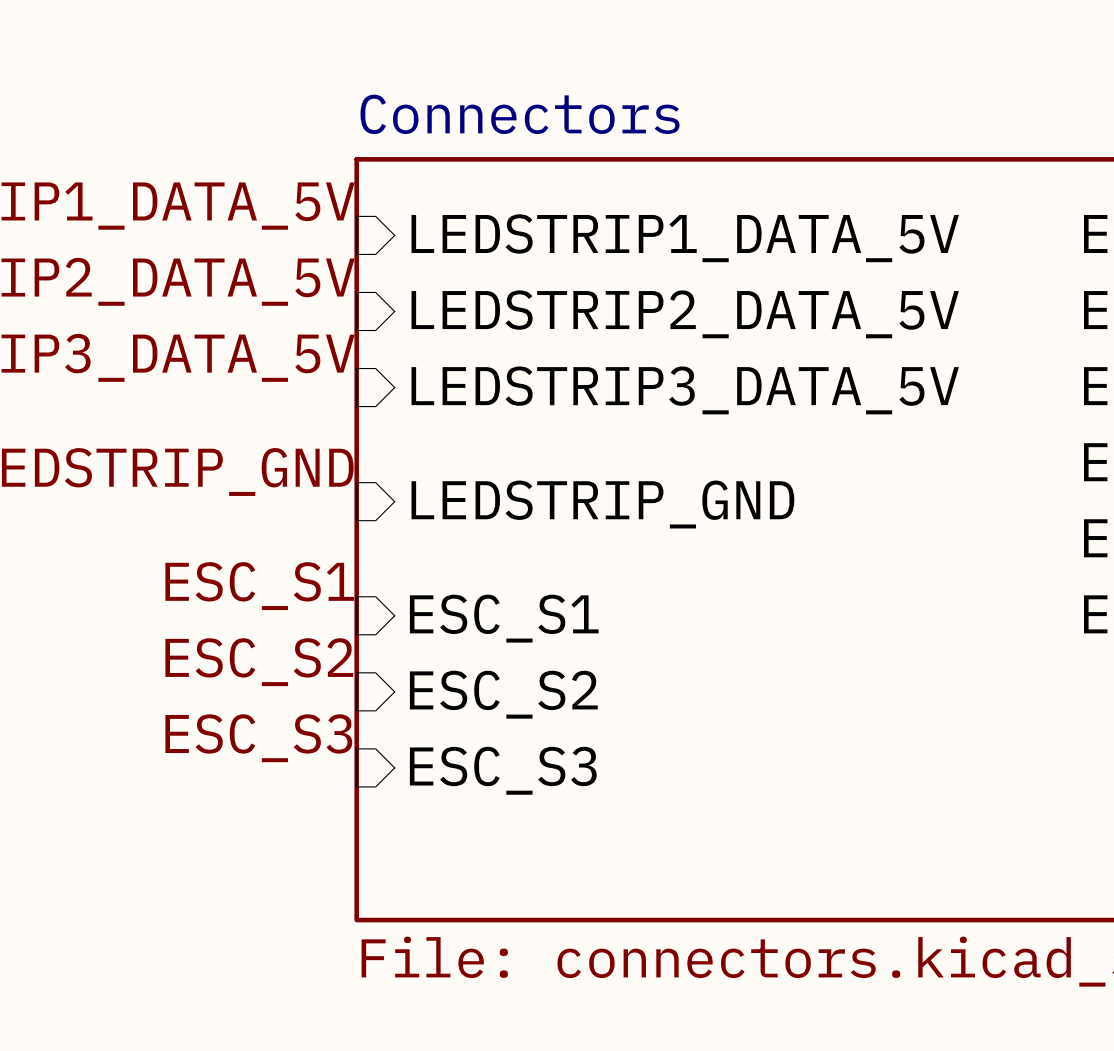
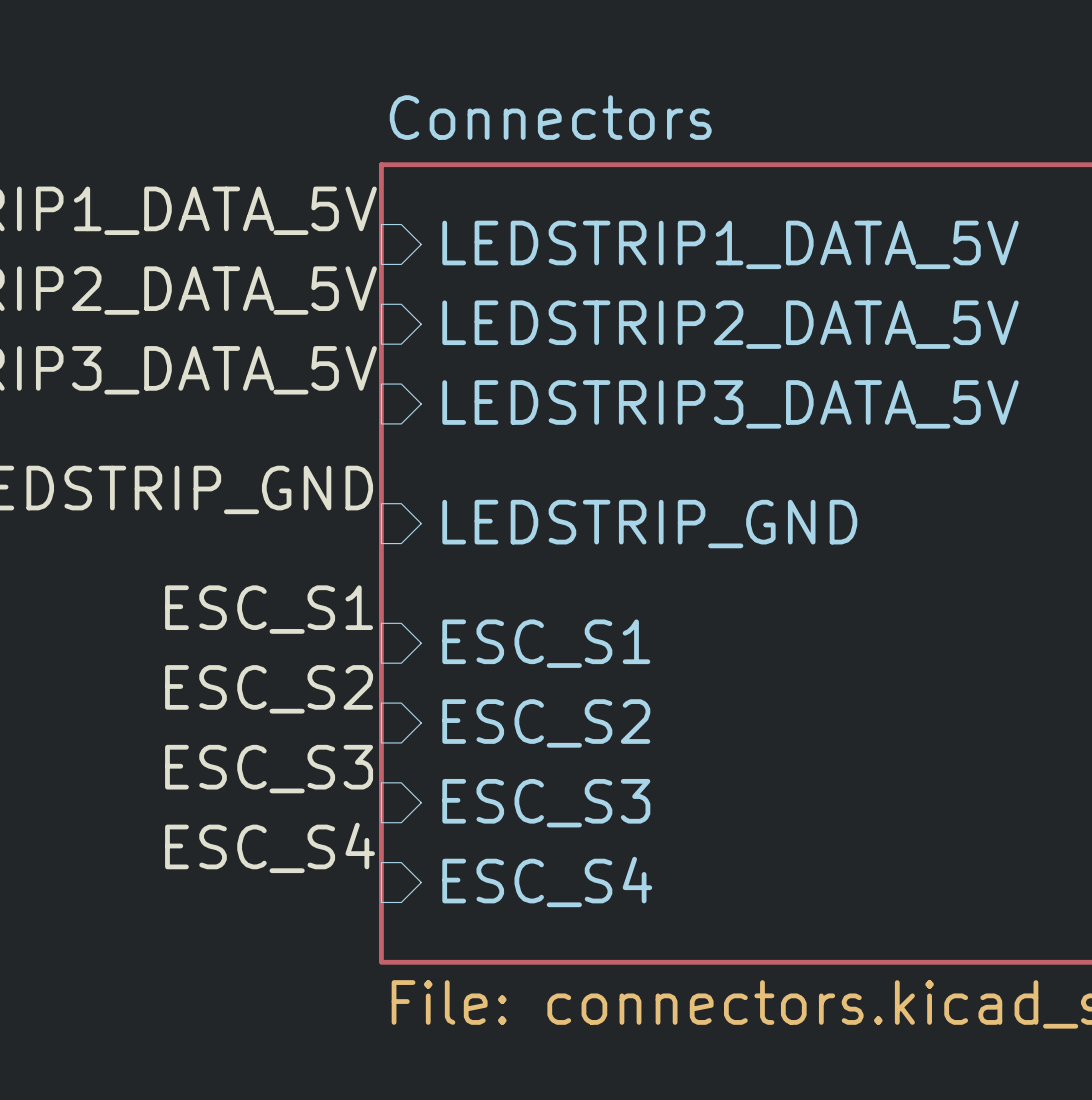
label: none -> ESC_S4 (270, 847)
sheet pin: none -> ESC_S4 (547, 881)

